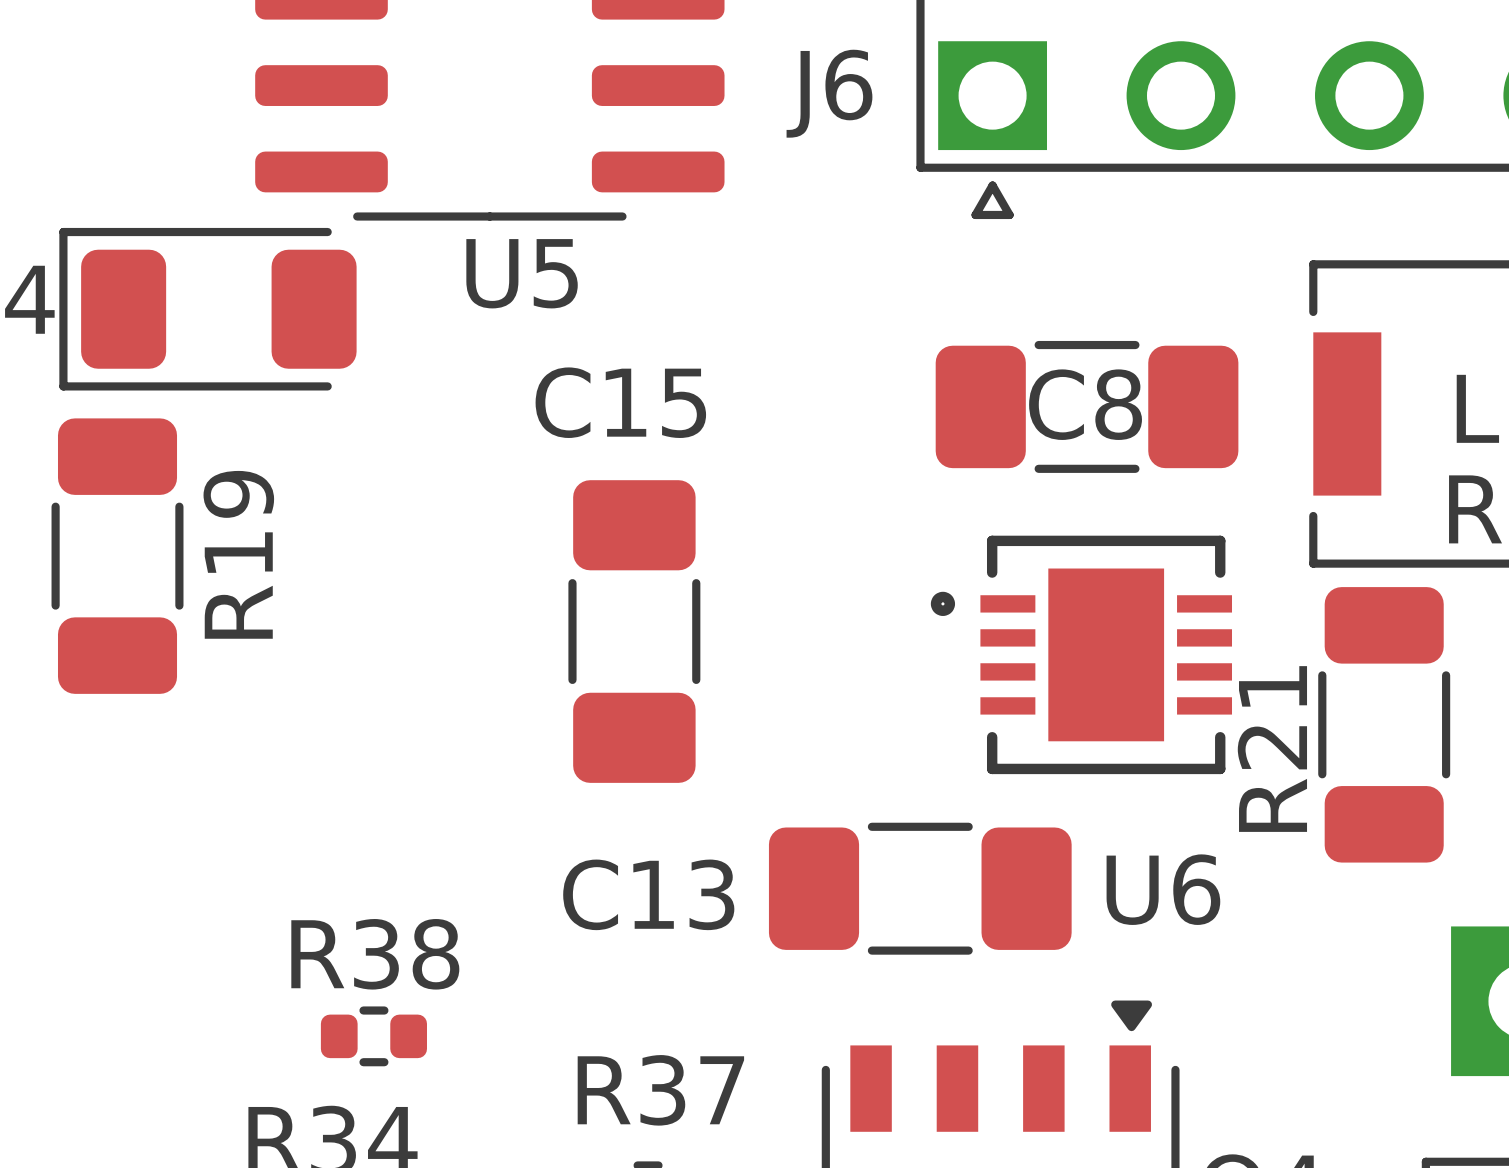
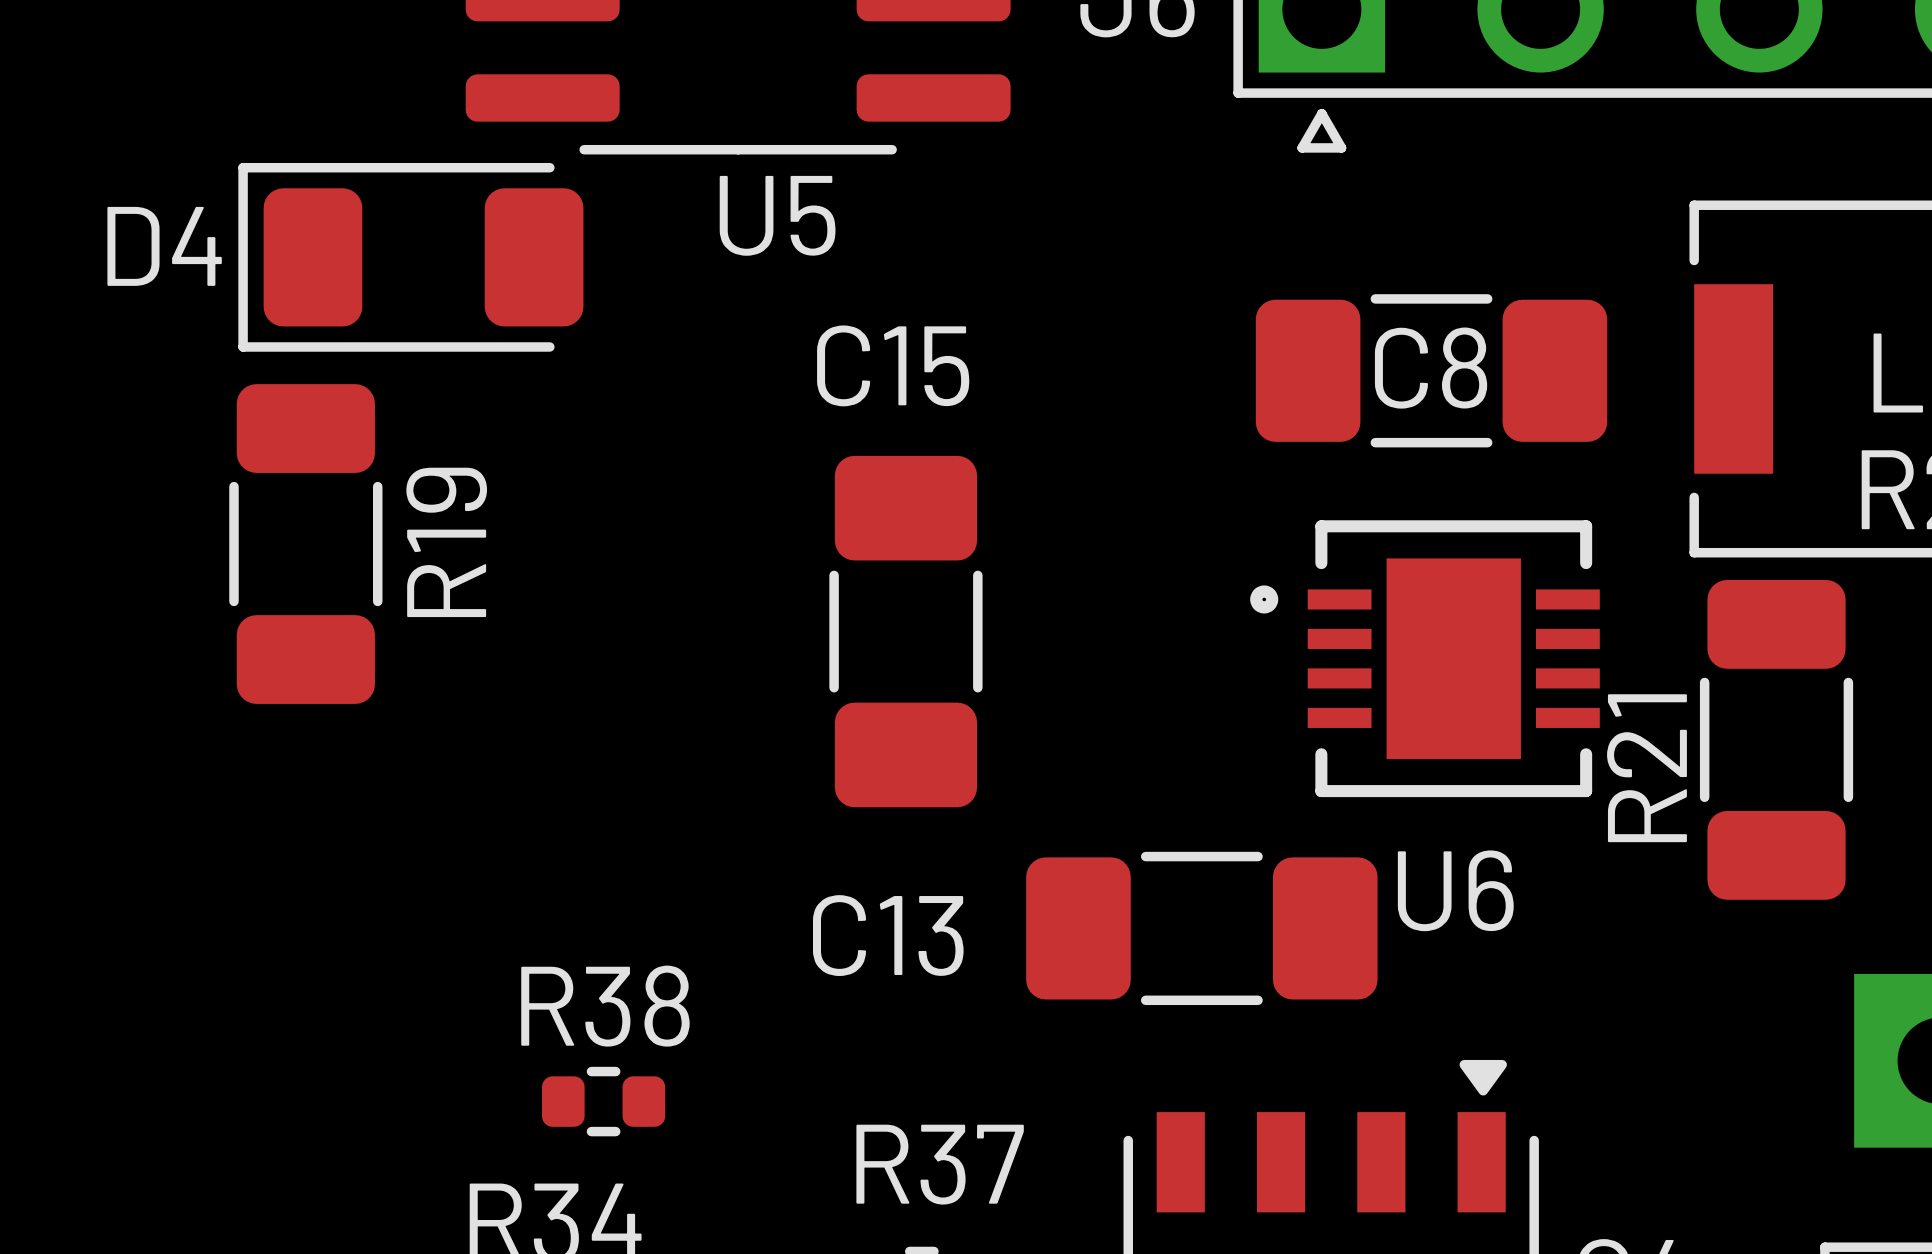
C13 position: (920, 888) -> (1201, 928)
U6 name position: U6 (1163, 889) -> U6 (1455, 890)

